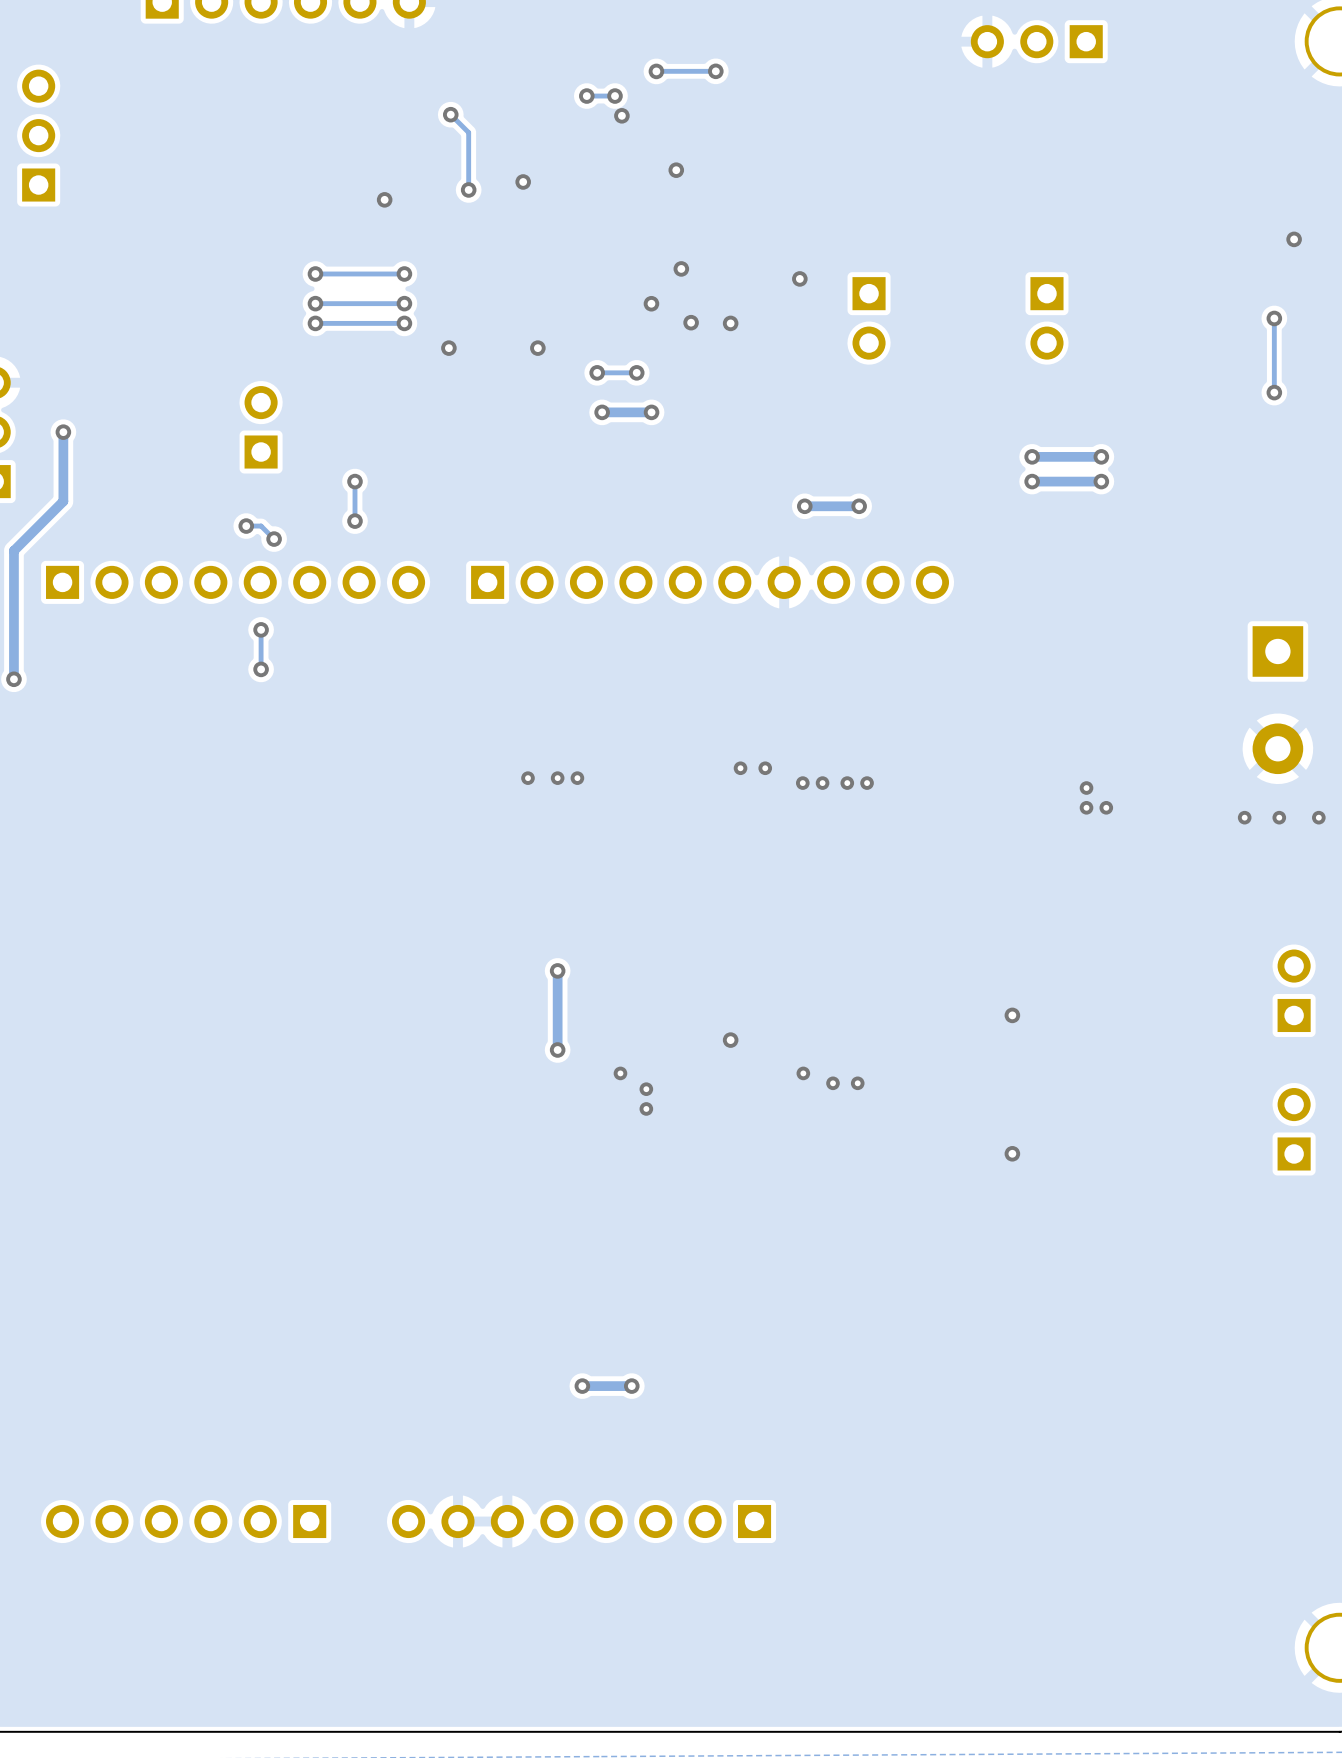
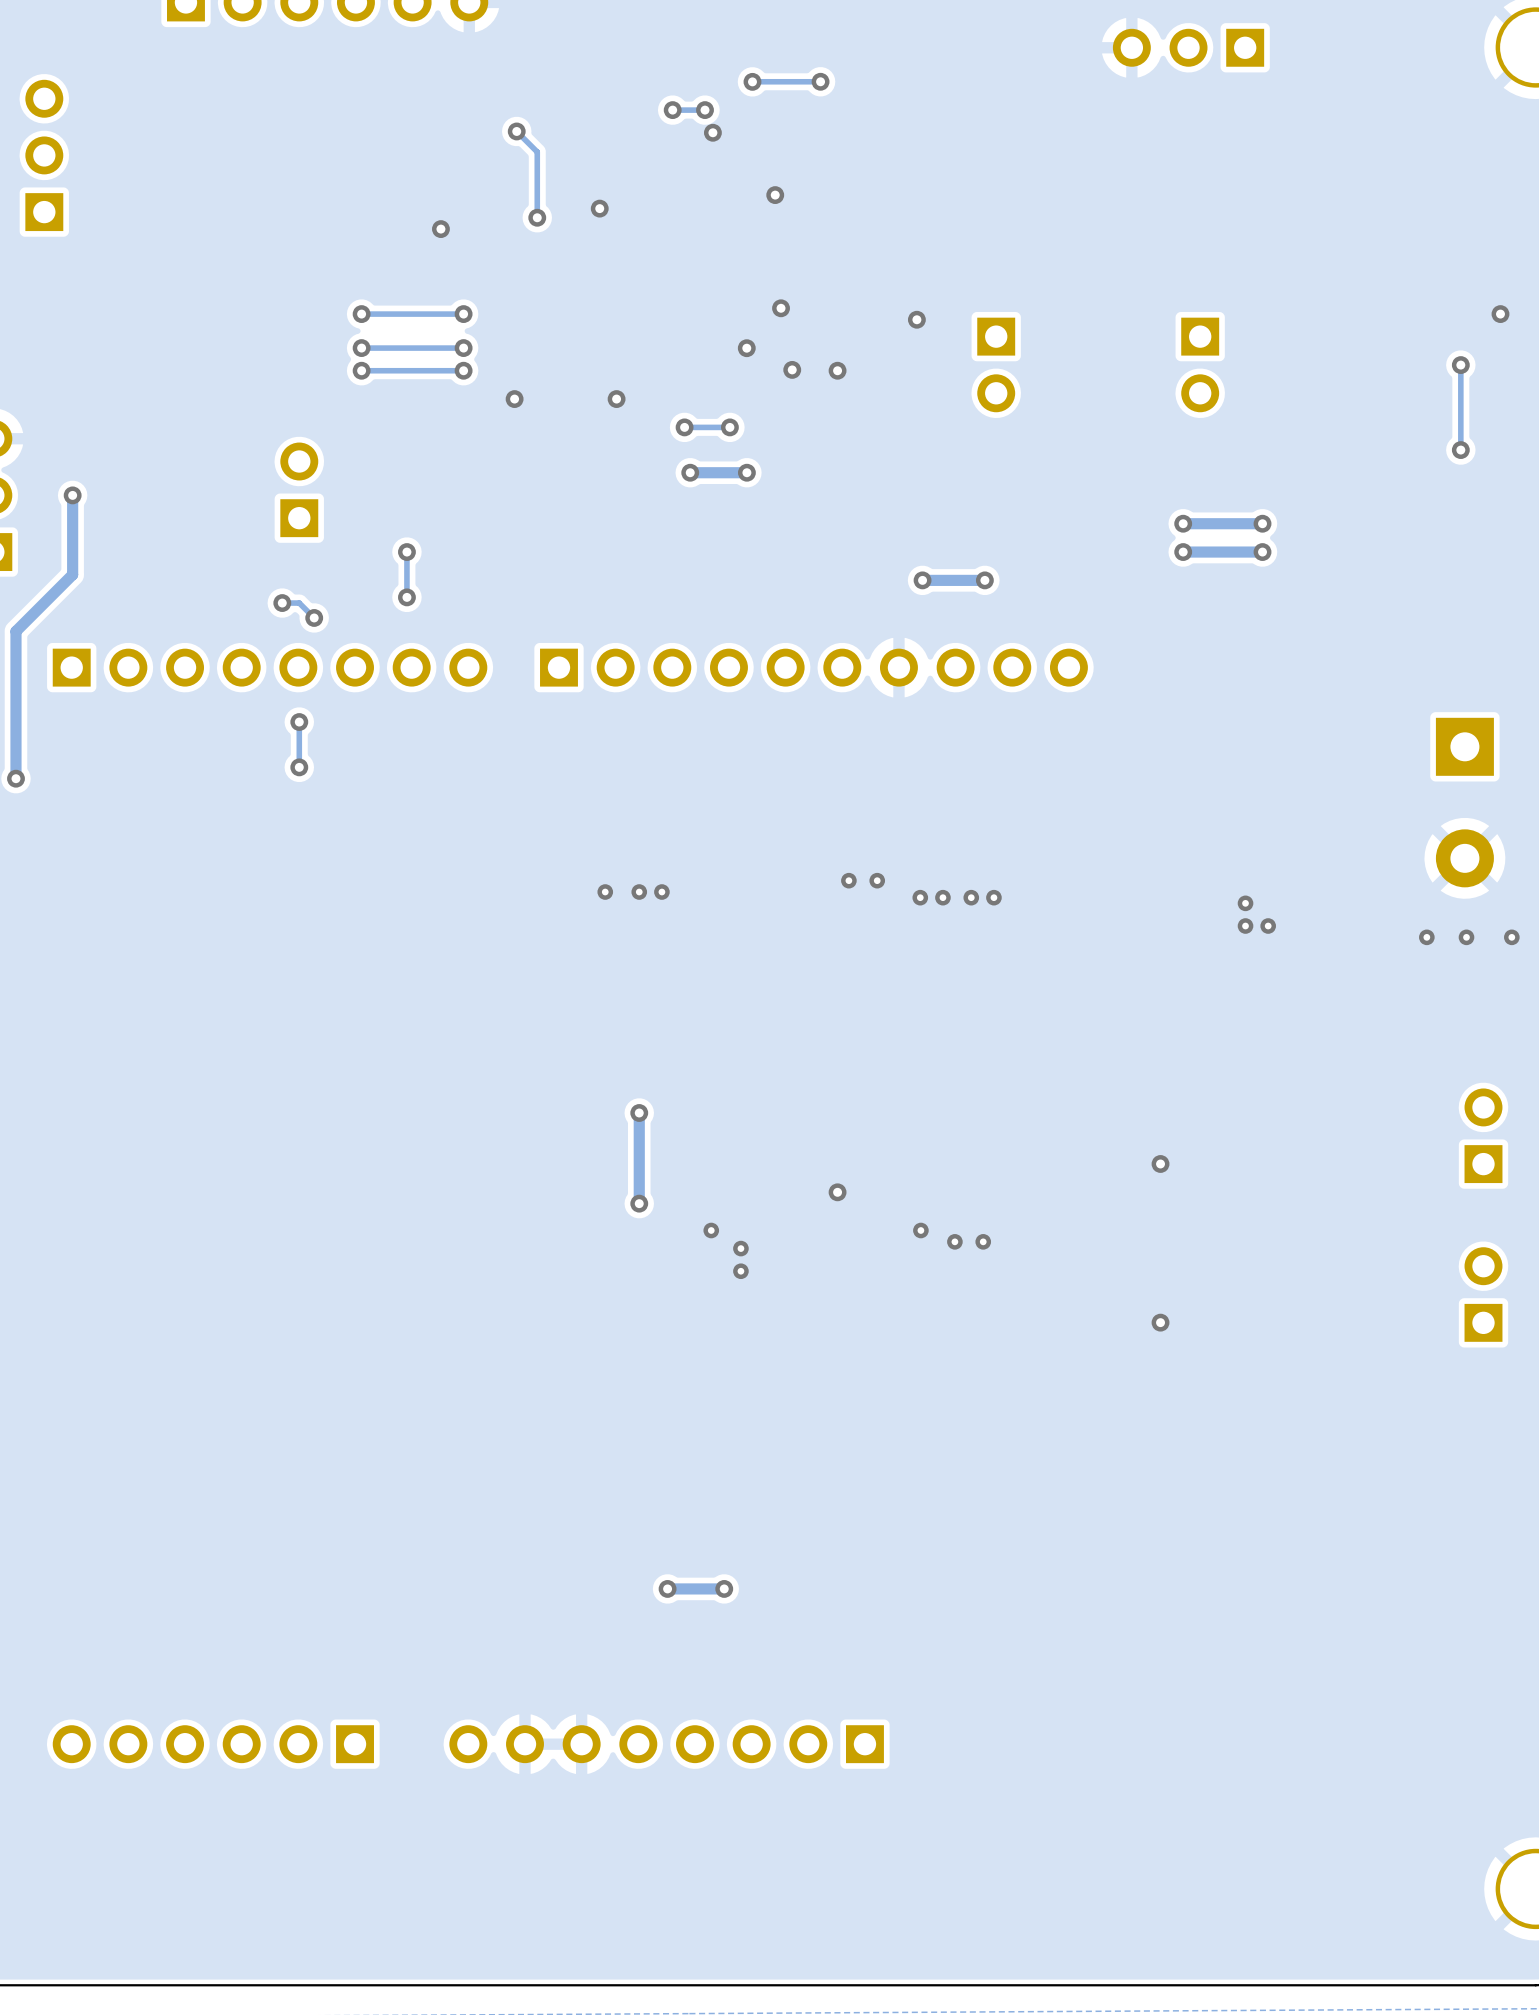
via position: (1294, 239) -> (1500, 314)

